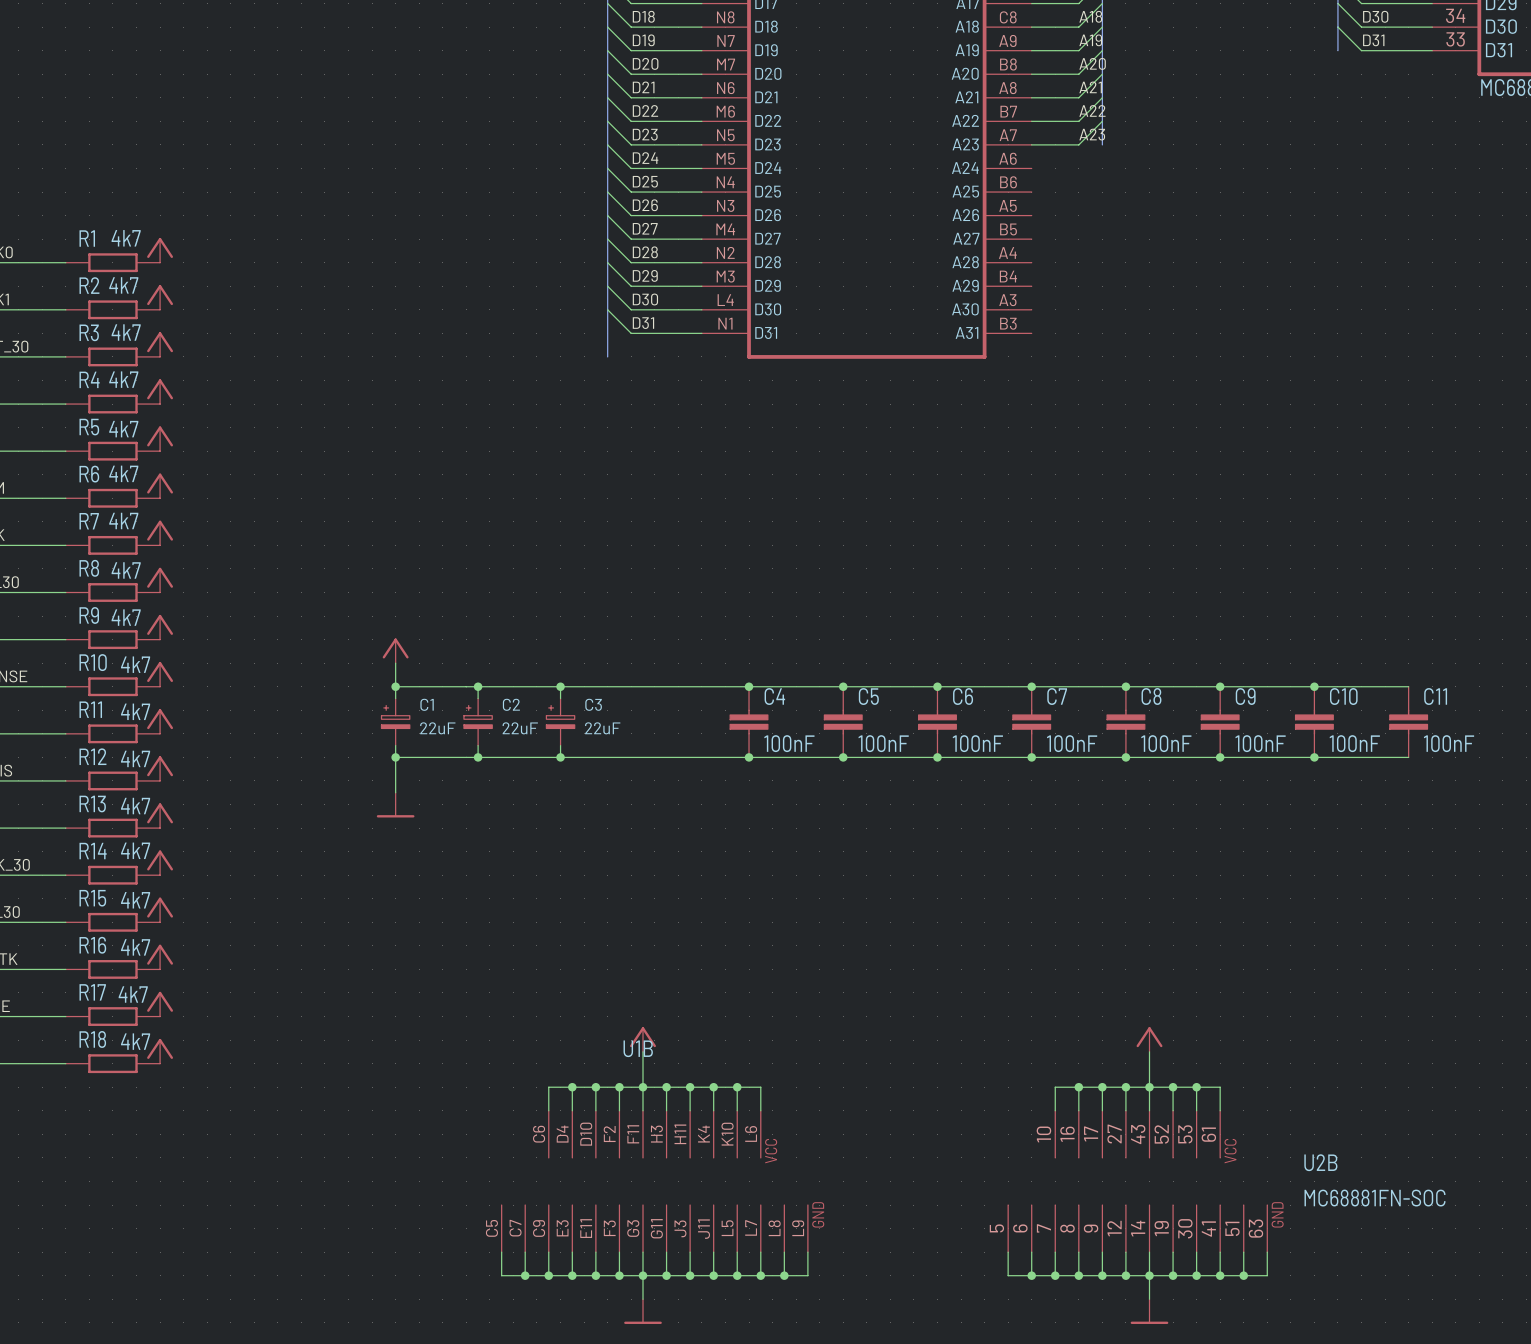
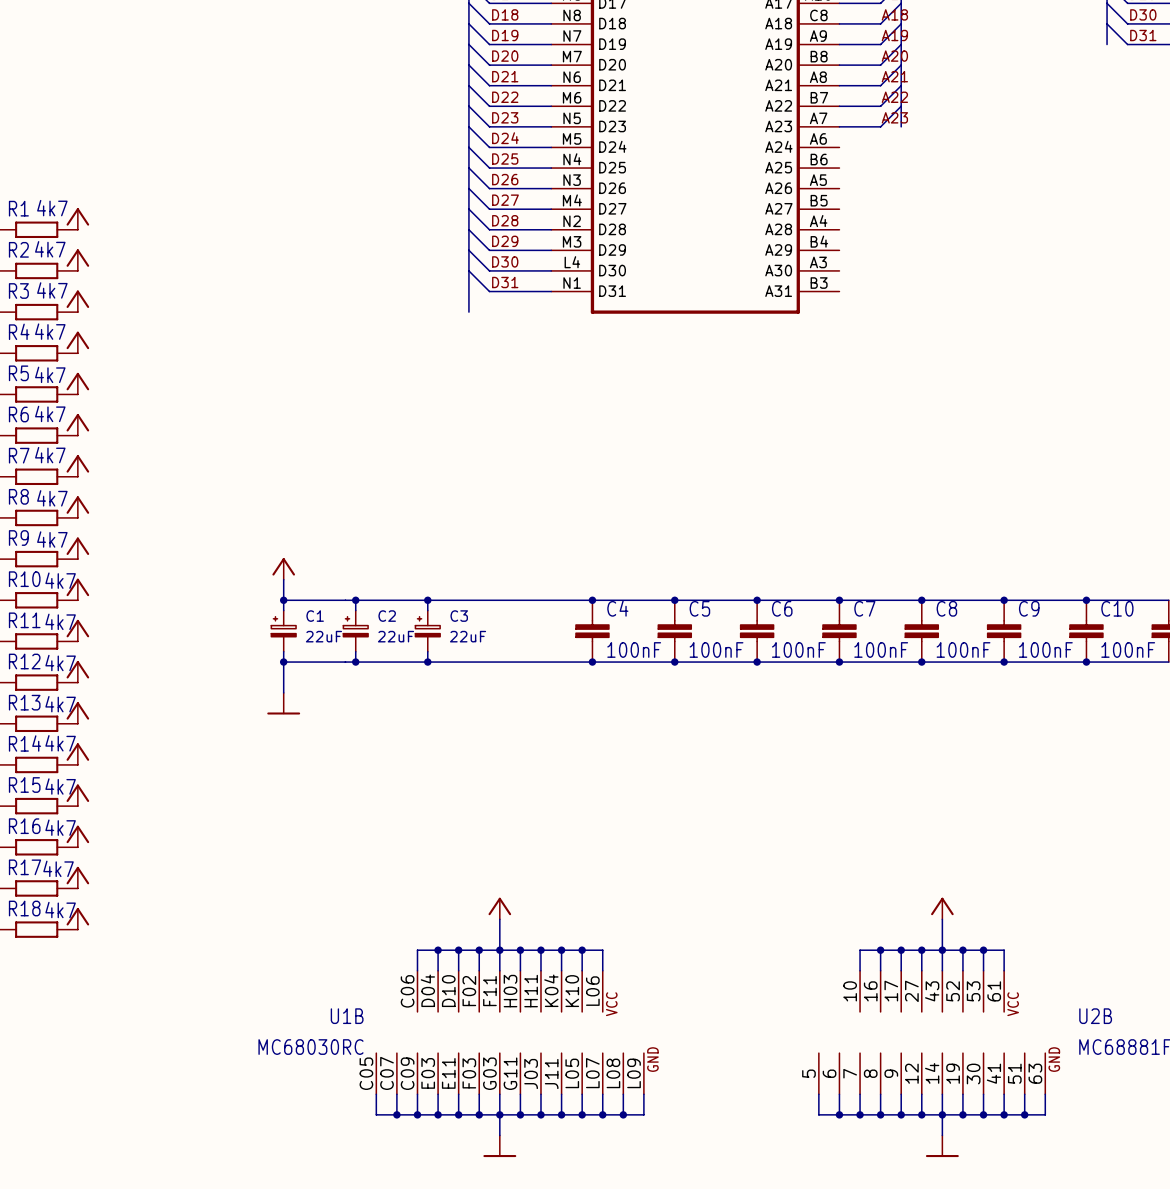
U1B name position: U1B (638, 1048) -> U1B (347, 1016)
U1B symbol: [501, 1110, 808, 1253] -> [376, 970, 644, 1095]
U1B value: none -> MC68030RC (310, 1047)

